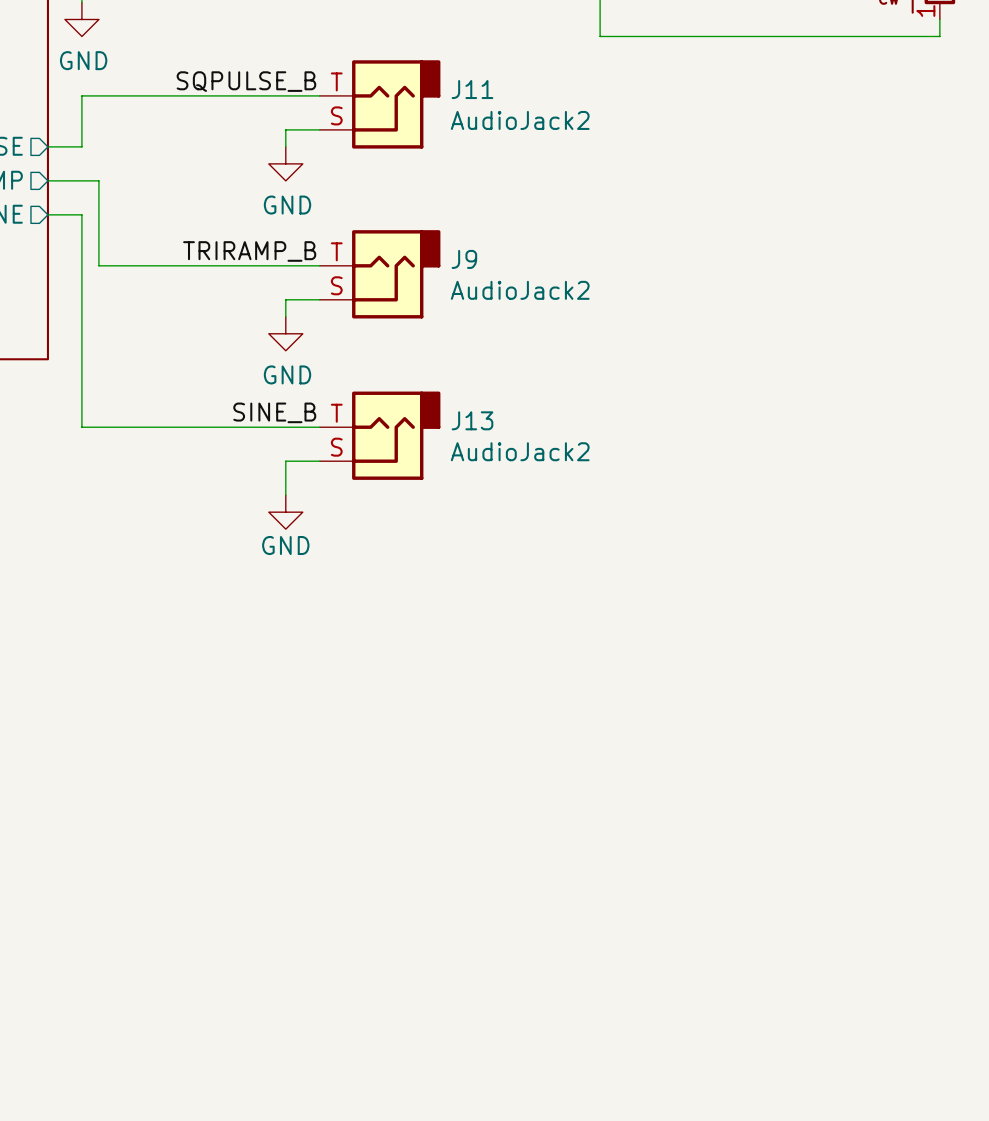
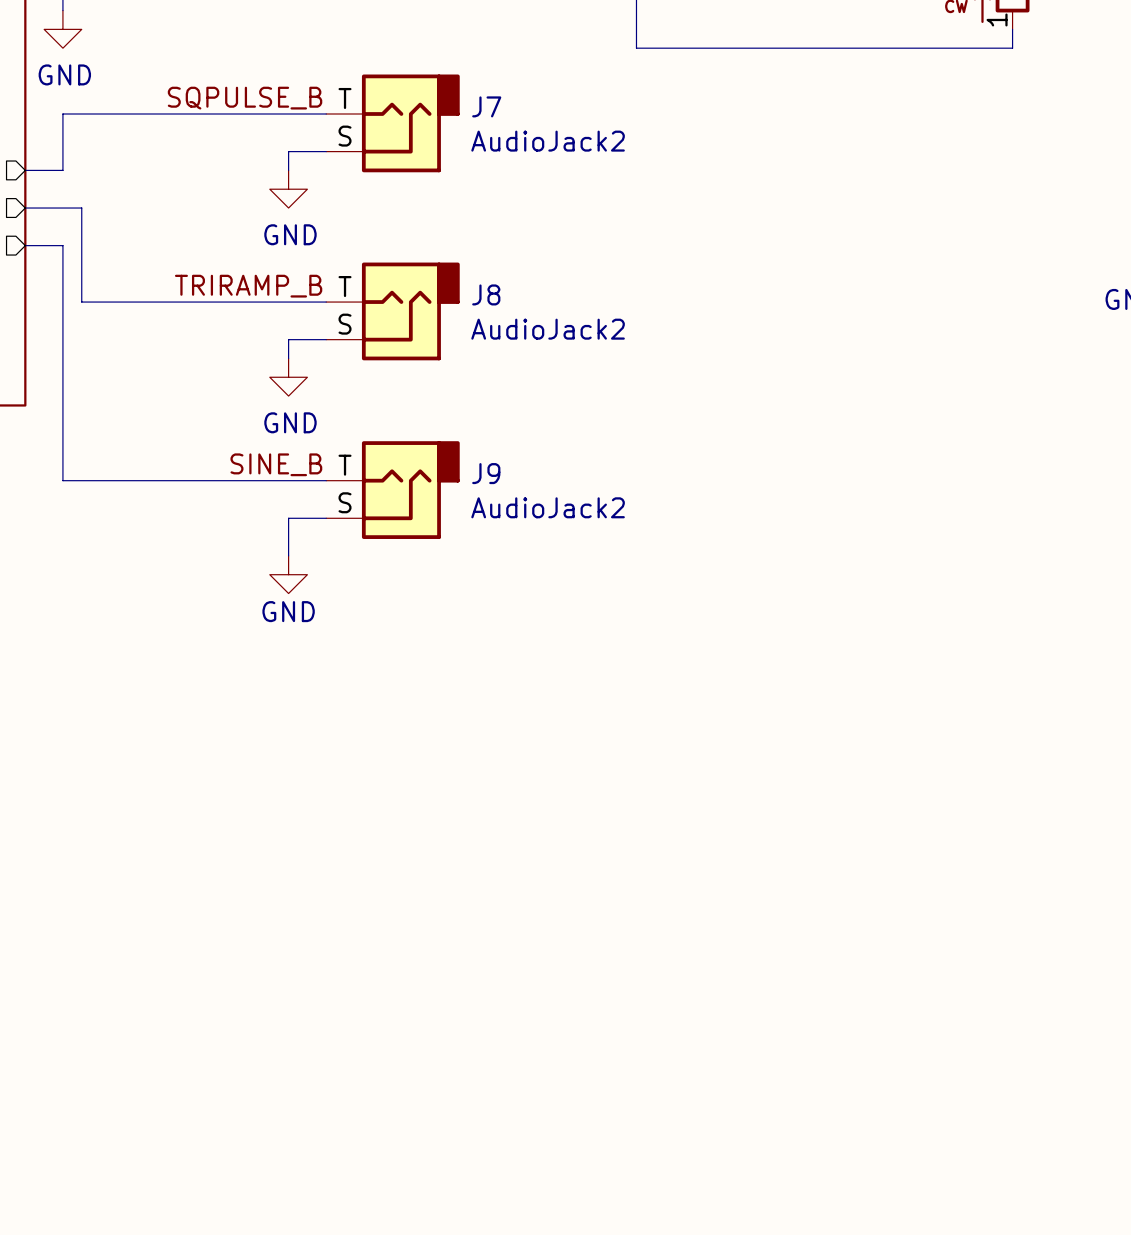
J11 name: J11 (472, 89) -> J7 (486, 106)
J9 name: J9 (464, 259) -> J8 (486, 294)
J13 name: J13 (472, 420) -> J9 (486, 473)

